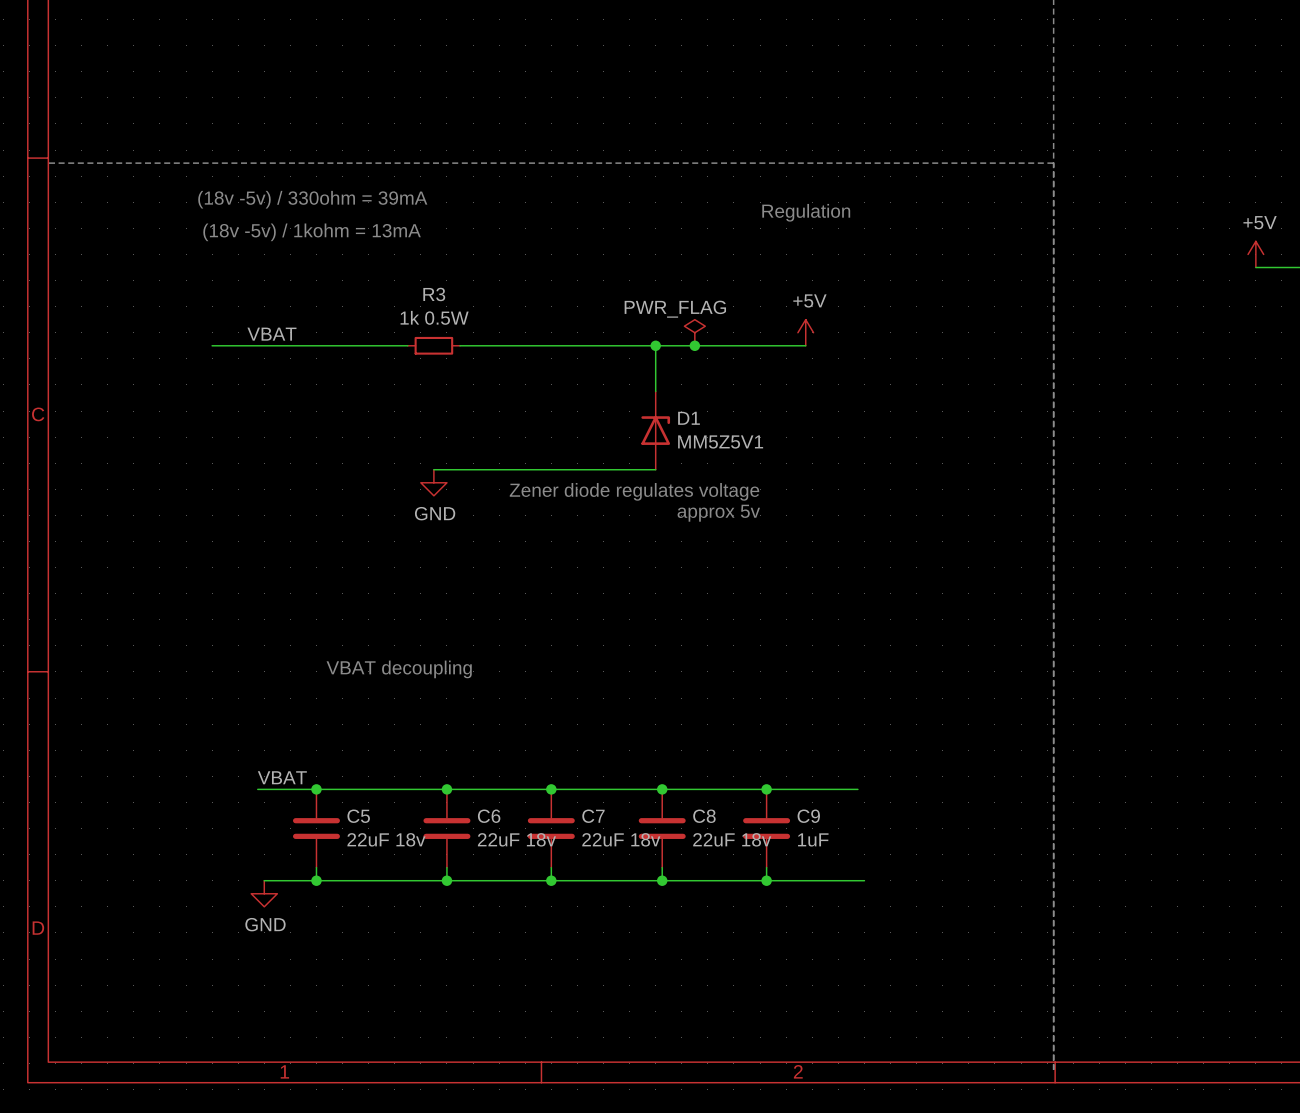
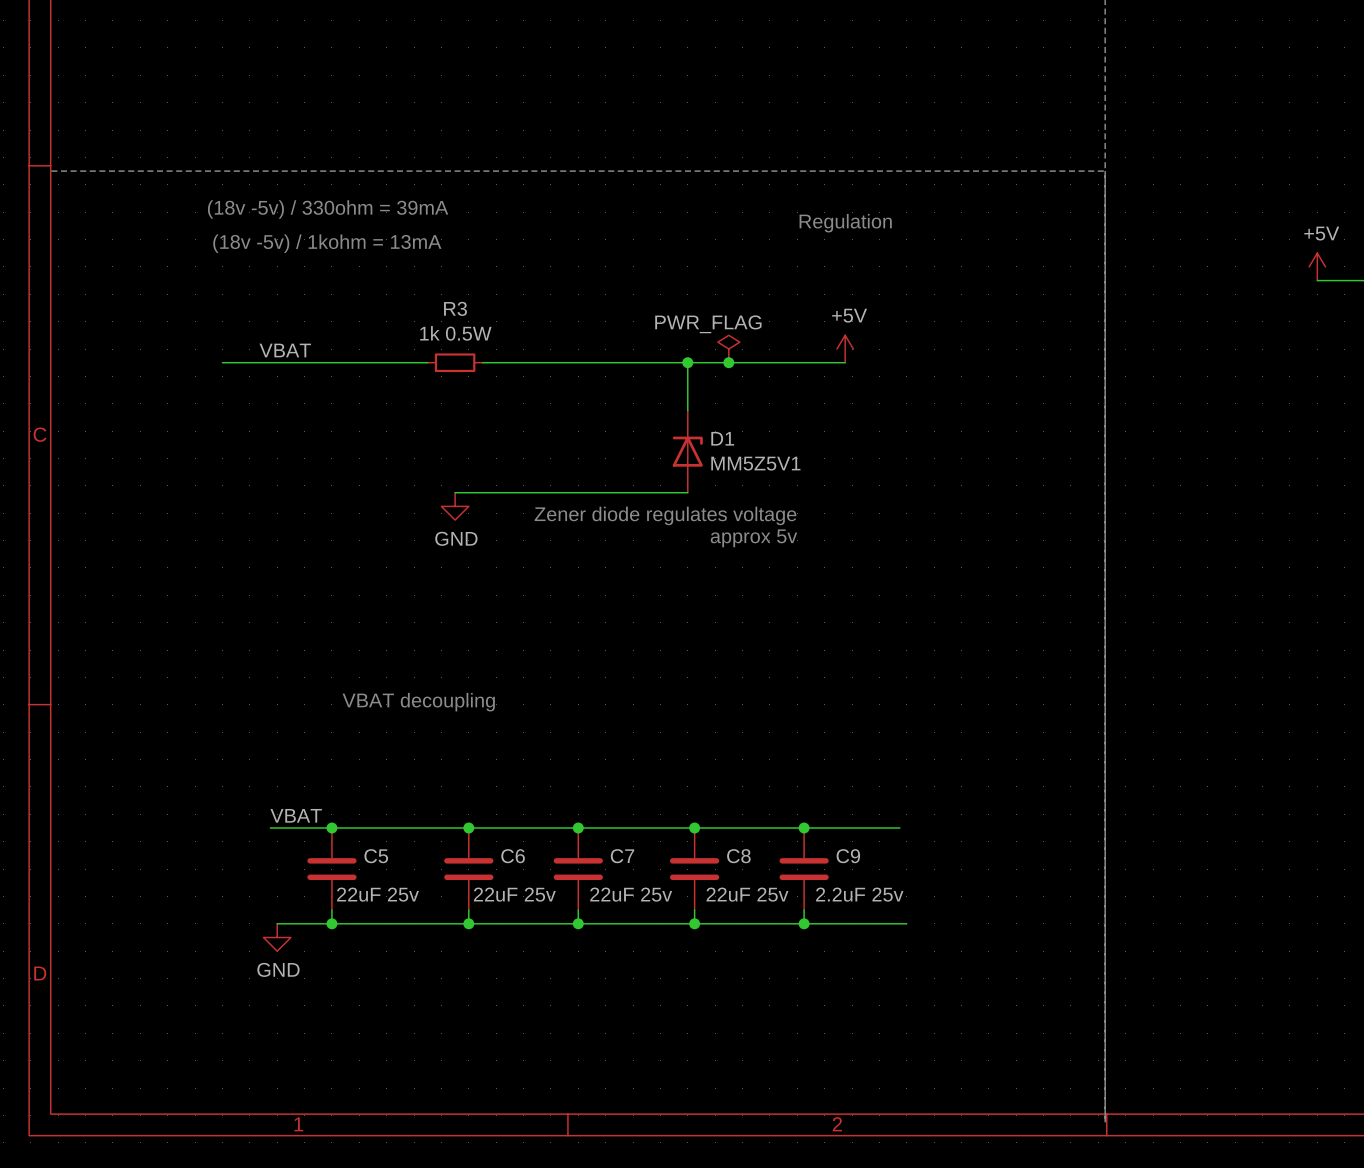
C5 value: 22uF 18v (386, 839) -> 22uF 25v (378, 894)
C6 value: 22uF 18v (516, 839) -> 22uF 25v (514, 894)
C7 value: 22uF 18v (621, 839) -> 22uF 25v (631, 894)
C8 value: 22uF 18v (732, 839) -> 22uF 25v (747, 894)
C9 value: 1uF (813, 839) -> 2.2uF 25v (859, 894)

